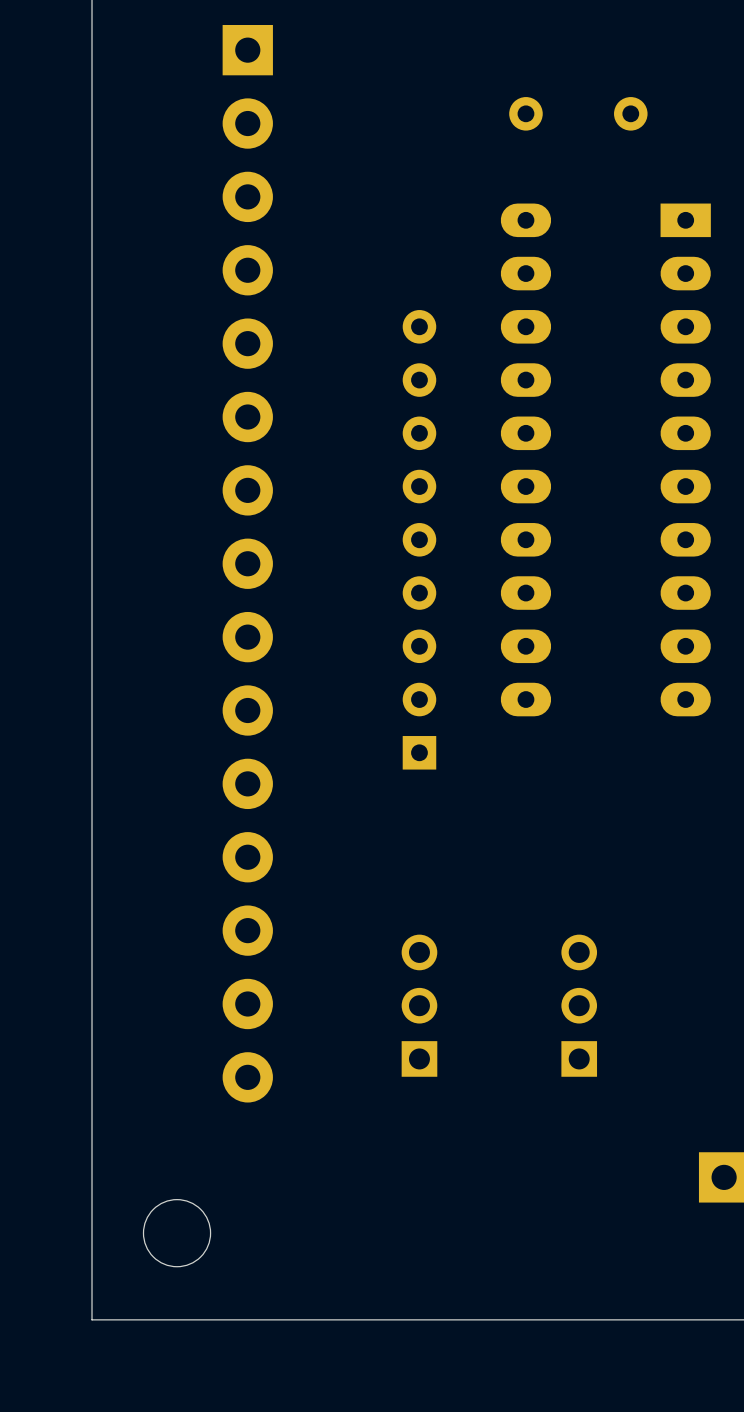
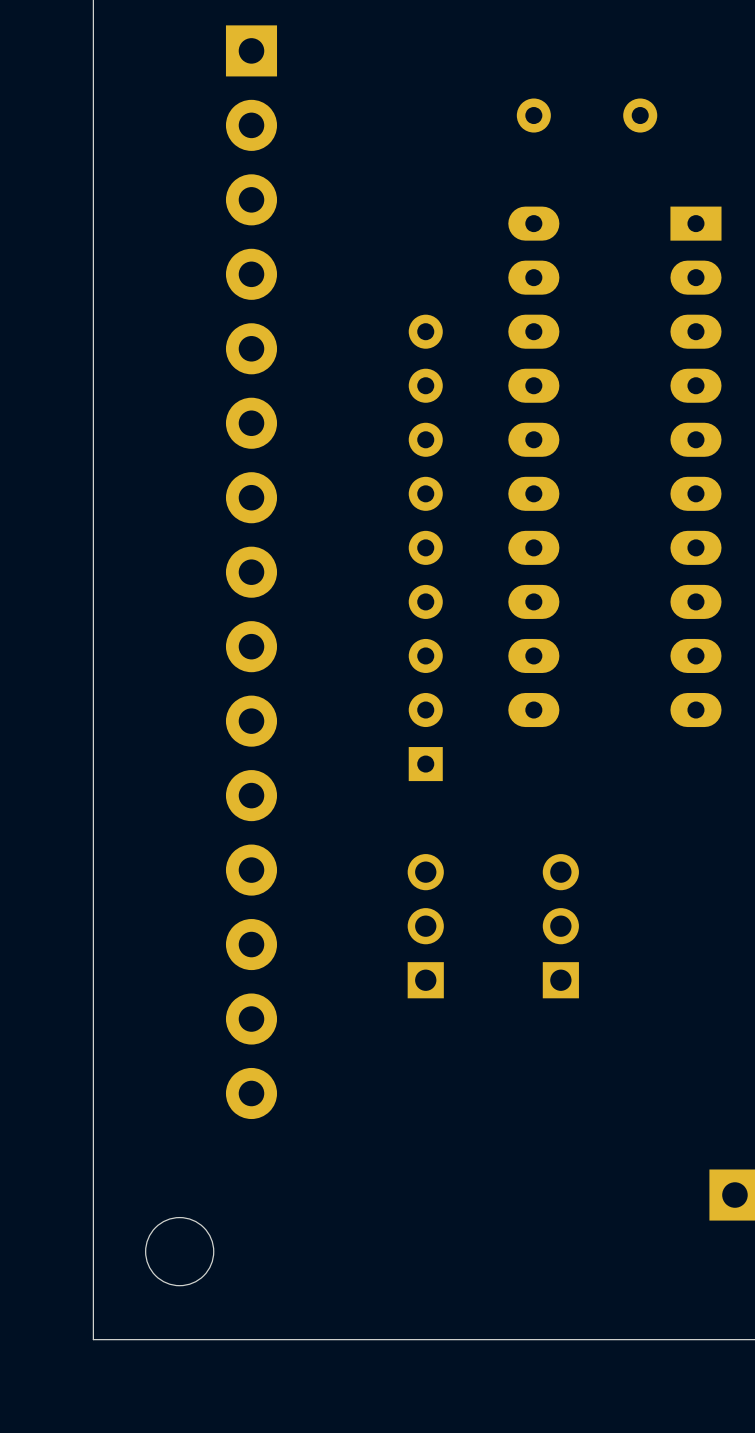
part: none -> (425, 926)
part: none -> (560, 926)
part: (419, 1005) -> none
part: (579, 1005) -> none

